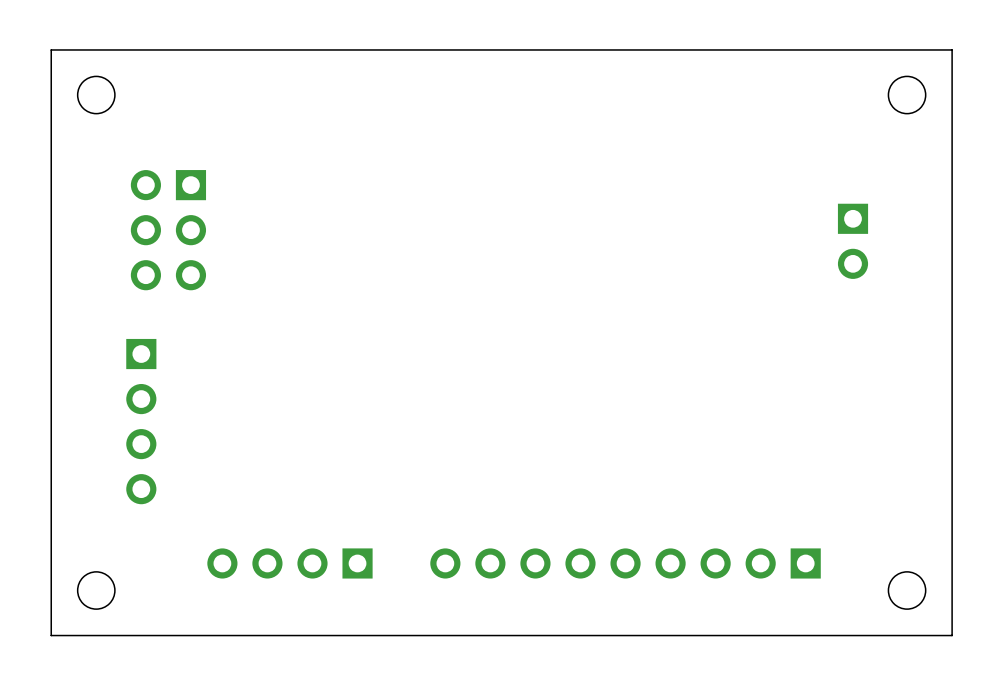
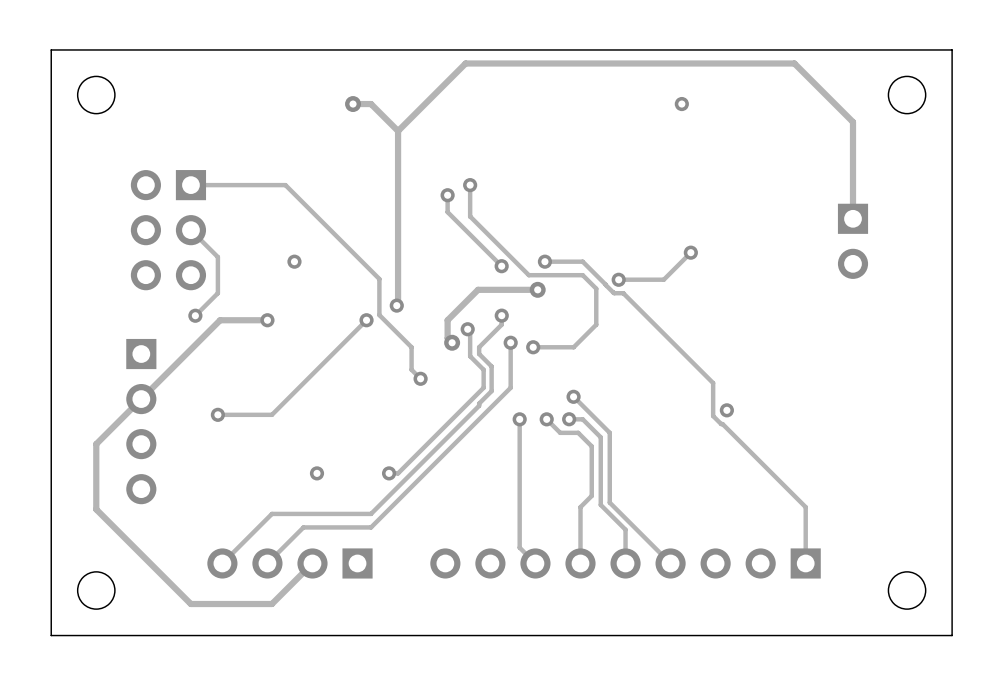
track: none -> (353, 104) (371, 104) (398, 131)
via: none -> (353, 104)
via: none -> (681, 104)
track: none -> (398, 131) (465, 63) (794, 63) (853, 122) (853, 218)
track: none -> (398, 131) (396, 305)
track: none -> (190, 185) (285, 185) (379, 279) (379, 315) (411, 347) (411, 369) (420, 378)
track: none -> (470, 185) (470, 216)
via: none -> (470, 185)
track: none -> (447, 195) (447, 212) (501, 266)
via: none -> (447, 195)
track: none -> (470, 216) (528, 275) (582, 275) (596, 288) (596, 324) (573, 347) (533, 347)
track: none -> (190, 230) (217, 257) (217, 293) (195, 315)
track: none -> (690, 252) (663, 279) (618, 279)
via: none -> (690, 252)
via: none -> (294, 261)
track: none -> (544, 261) (582, 261) (605, 284)
via: none -> (544, 261)
via: none -> (501, 266)
via: none -> (618, 279)
track: none -> (605, 285) (613, 292)
track: none -> (537, 289) (478, 289) (447, 320) (447, 338) (452, 342)
via: none -> (537, 289)
track: none -> (613, 292) (623, 293)
track: none -> (623, 293) (713, 383) (713, 416) (805, 507) (805, 563)
via: none -> (396, 305)
via: none -> (195, 315)
track: none -> (501, 315) (501, 324) (479, 347) (479, 354) (491, 366) (491, 391) (371, 513) (271, 513) (222, 563)
via: none -> (501, 315)
track: none -> (267, 320) (220, 320) (96, 444) (96, 509) (190, 604) (271, 604) (312, 563)
via: none -> (267, 320)
track: none -> (366, 320) (271, 414) (217, 414)
via: none -> (366, 320)
track: none -> (467, 329) (470, 331) (470, 356) (483, 369) (483, 387) (398, 473) (389, 473)
via: none -> (467, 329)
via: none -> (452, 342)
track: none -> (510, 342) (510, 387) (371, 527) (303, 527) (267, 563)
via: none -> (510, 342)
via: none -> (533, 347)
via: none -> (420, 378)
track: none -> (573, 396) (609, 432) (609, 502) (670, 563)
via: none -> (573, 396)
via: none -> (726, 410)
via: none -> (217, 414)
track: none -> (519, 419) (519, 547) (535, 563)
via: none -> (519, 419)
track: none -> (546, 419) (560, 432) (578, 432) (591, 446) (591, 495) (580, 507) (580, 563)
via: none -> (546, 419)
track: none -> (569, 419) (582, 419) (600, 437) (600, 504) (625, 529) (625, 563)
via: none -> (569, 419)
via: none -> (316, 473)
via: none -> (389, 473)

